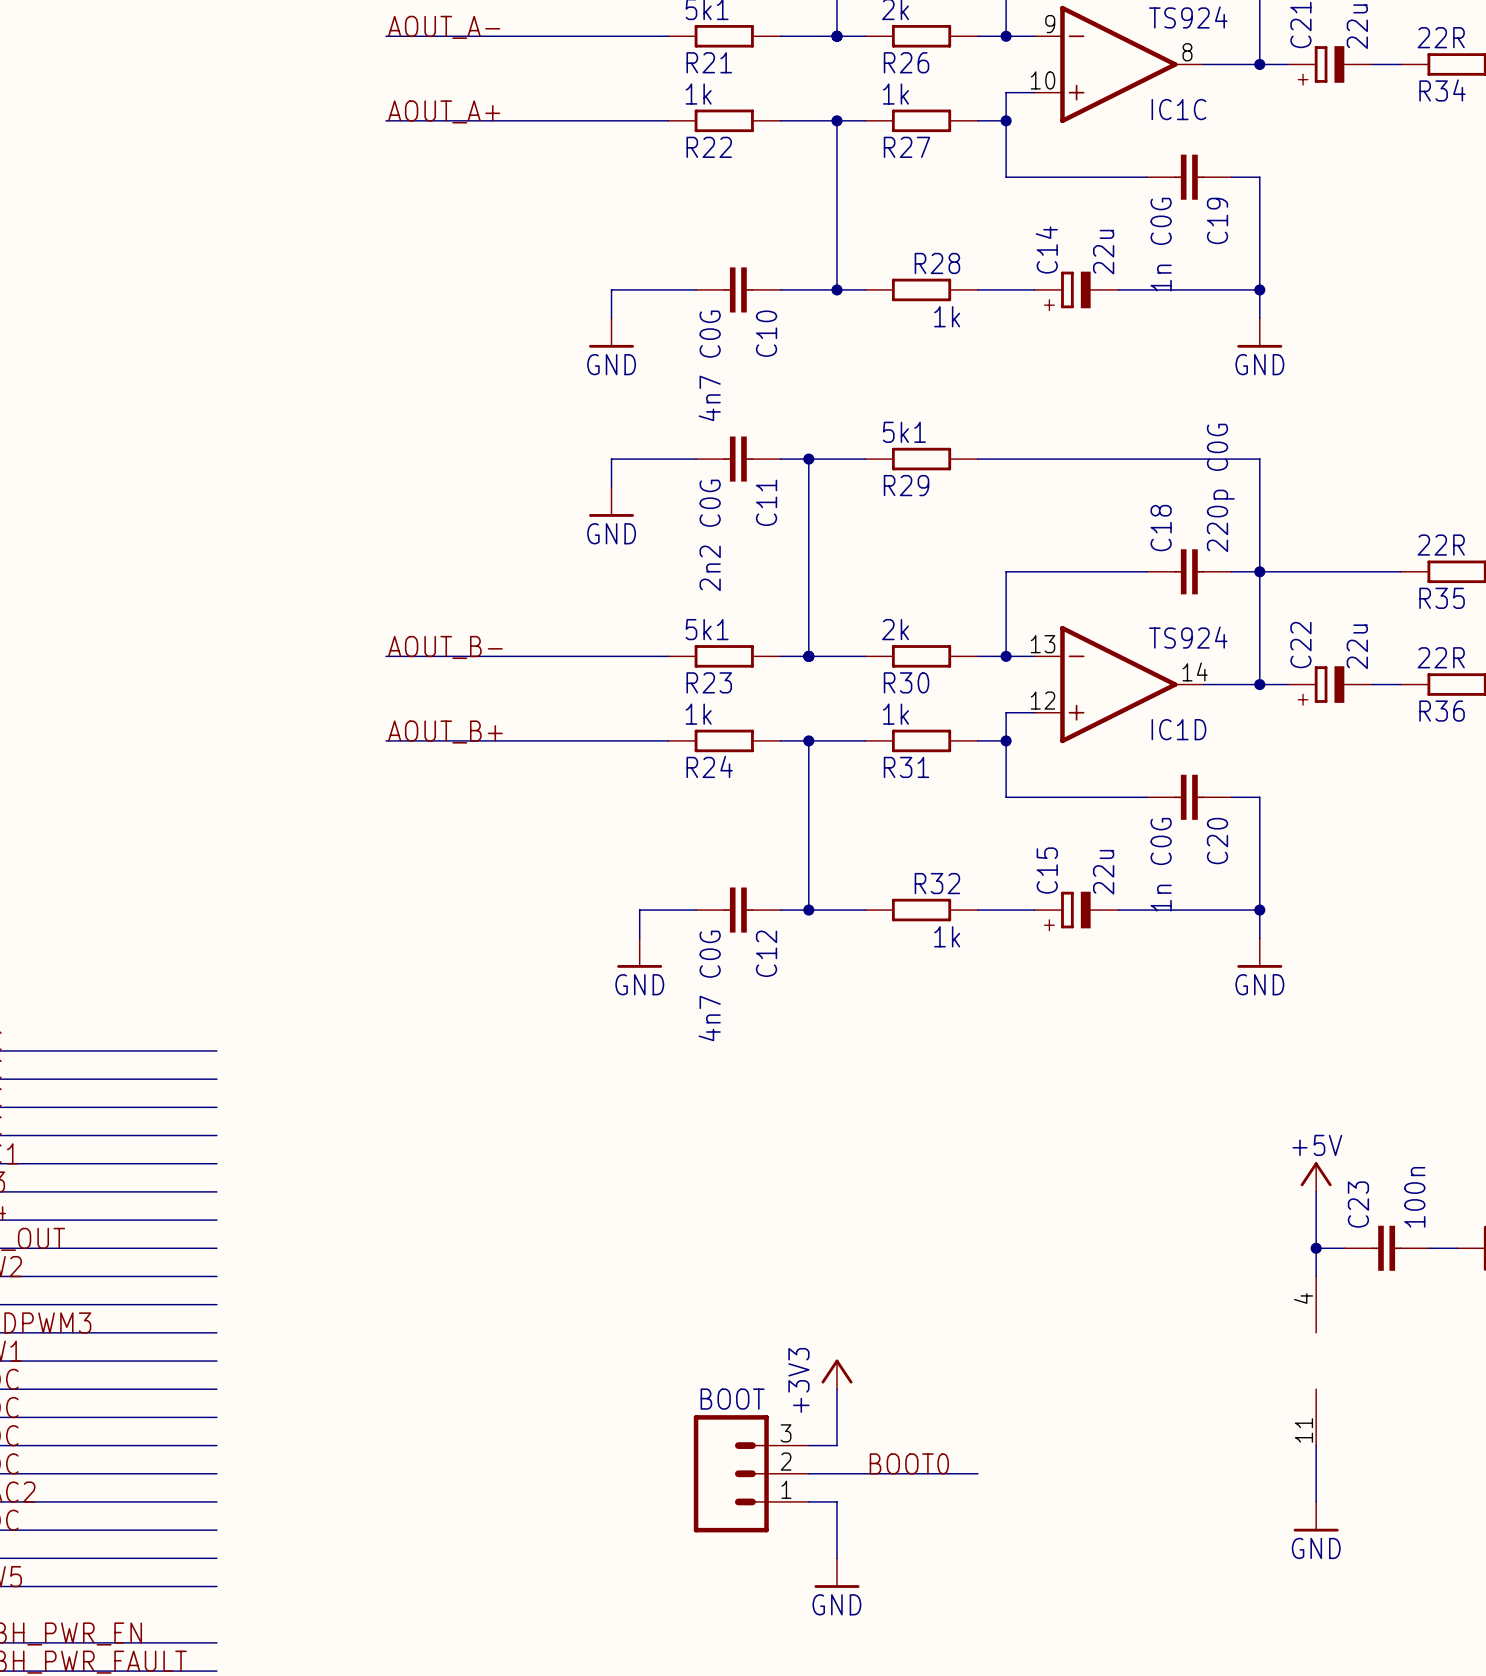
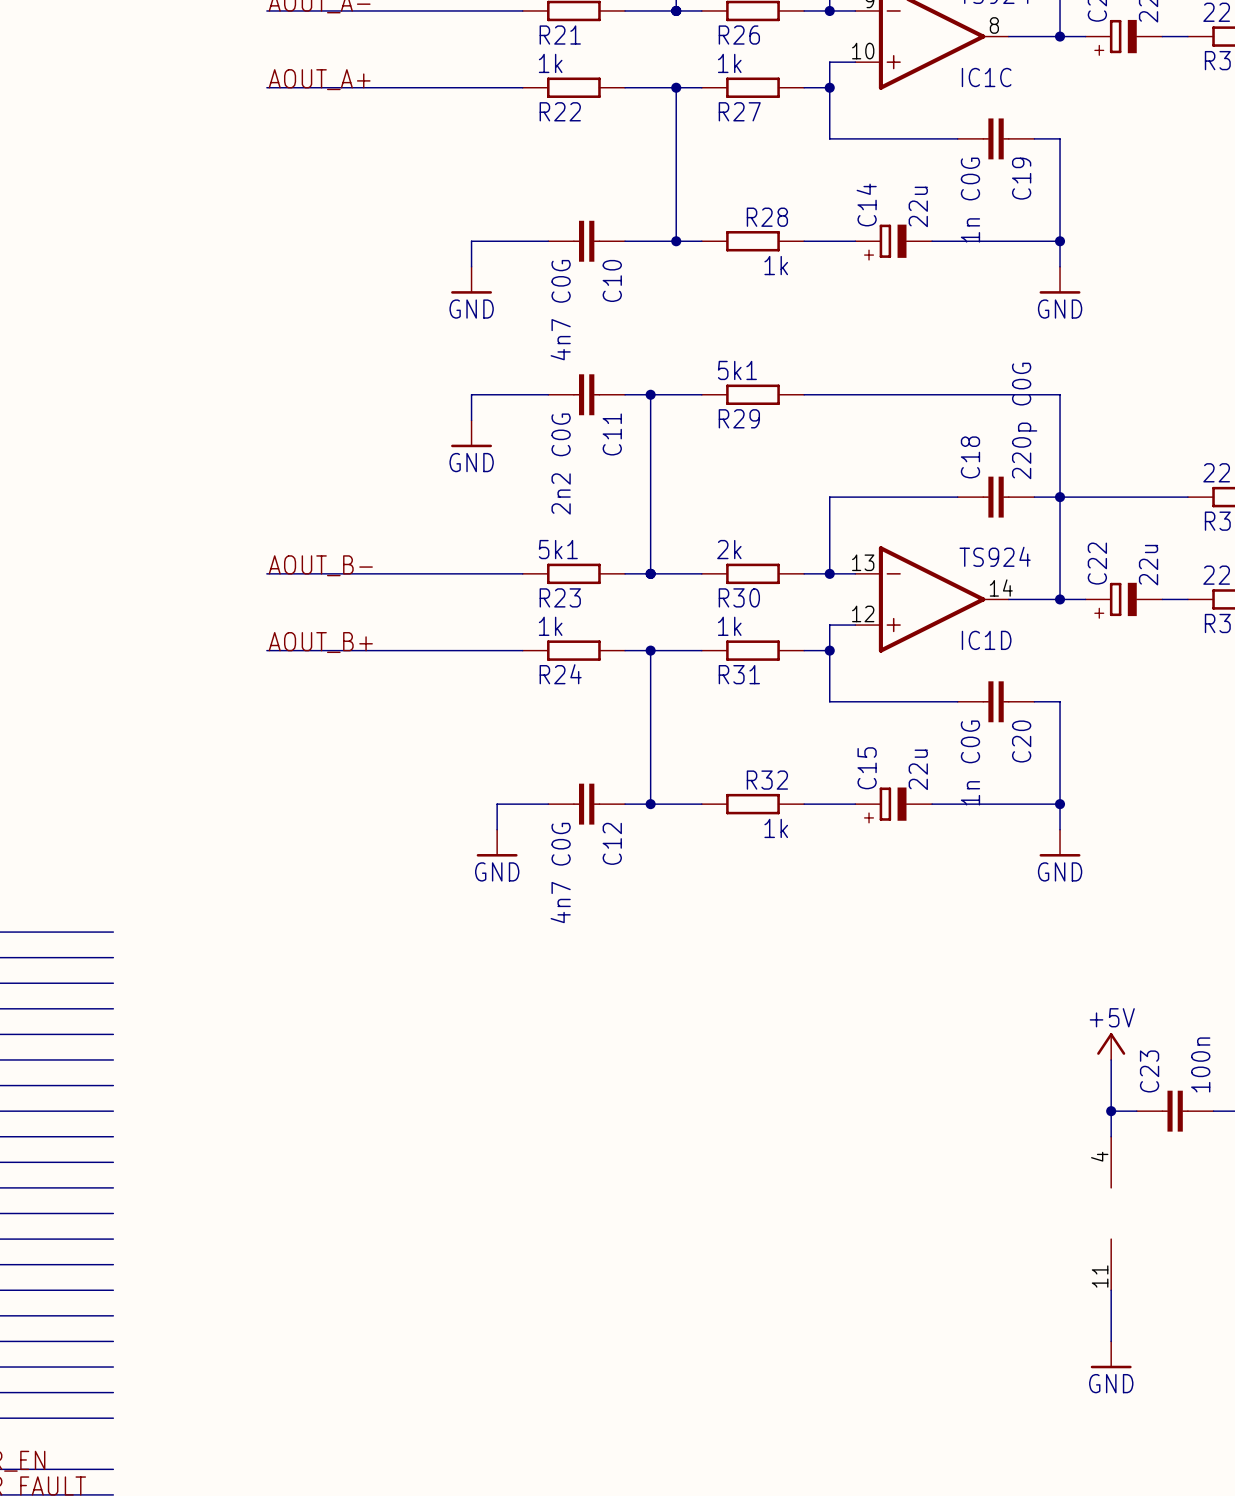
power symbol: +3V3 (836, 1374) -> none
wire: (836, 1389) (836, 1445) (808, 1445) -> none
label: BOOT0 (909, 1463) -> none
BOOT: (751, 1473) -> none
wire: (808, 1473) (977, 1473) -> none
wire: (808, 1501) (836, 1501) (836, 1558) -> none
power symbol: GND (836, 1573) -> none

